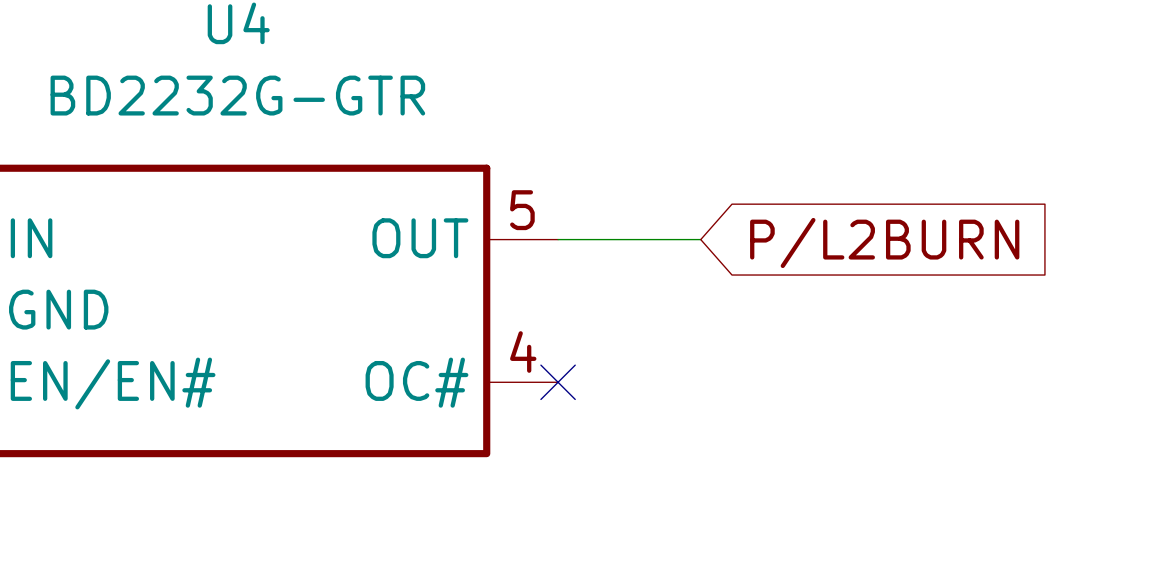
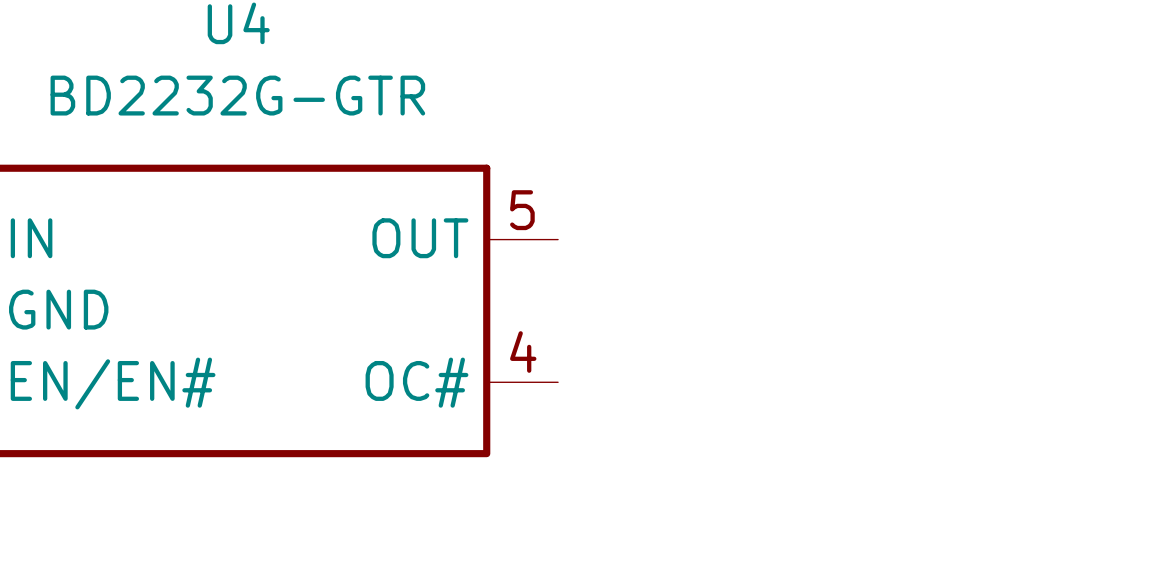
wire: (558, 239) (700, 239) -> none
global label: P/L2BURN (884, 242) -> none
no-connect mark: (558, 382) -> none

